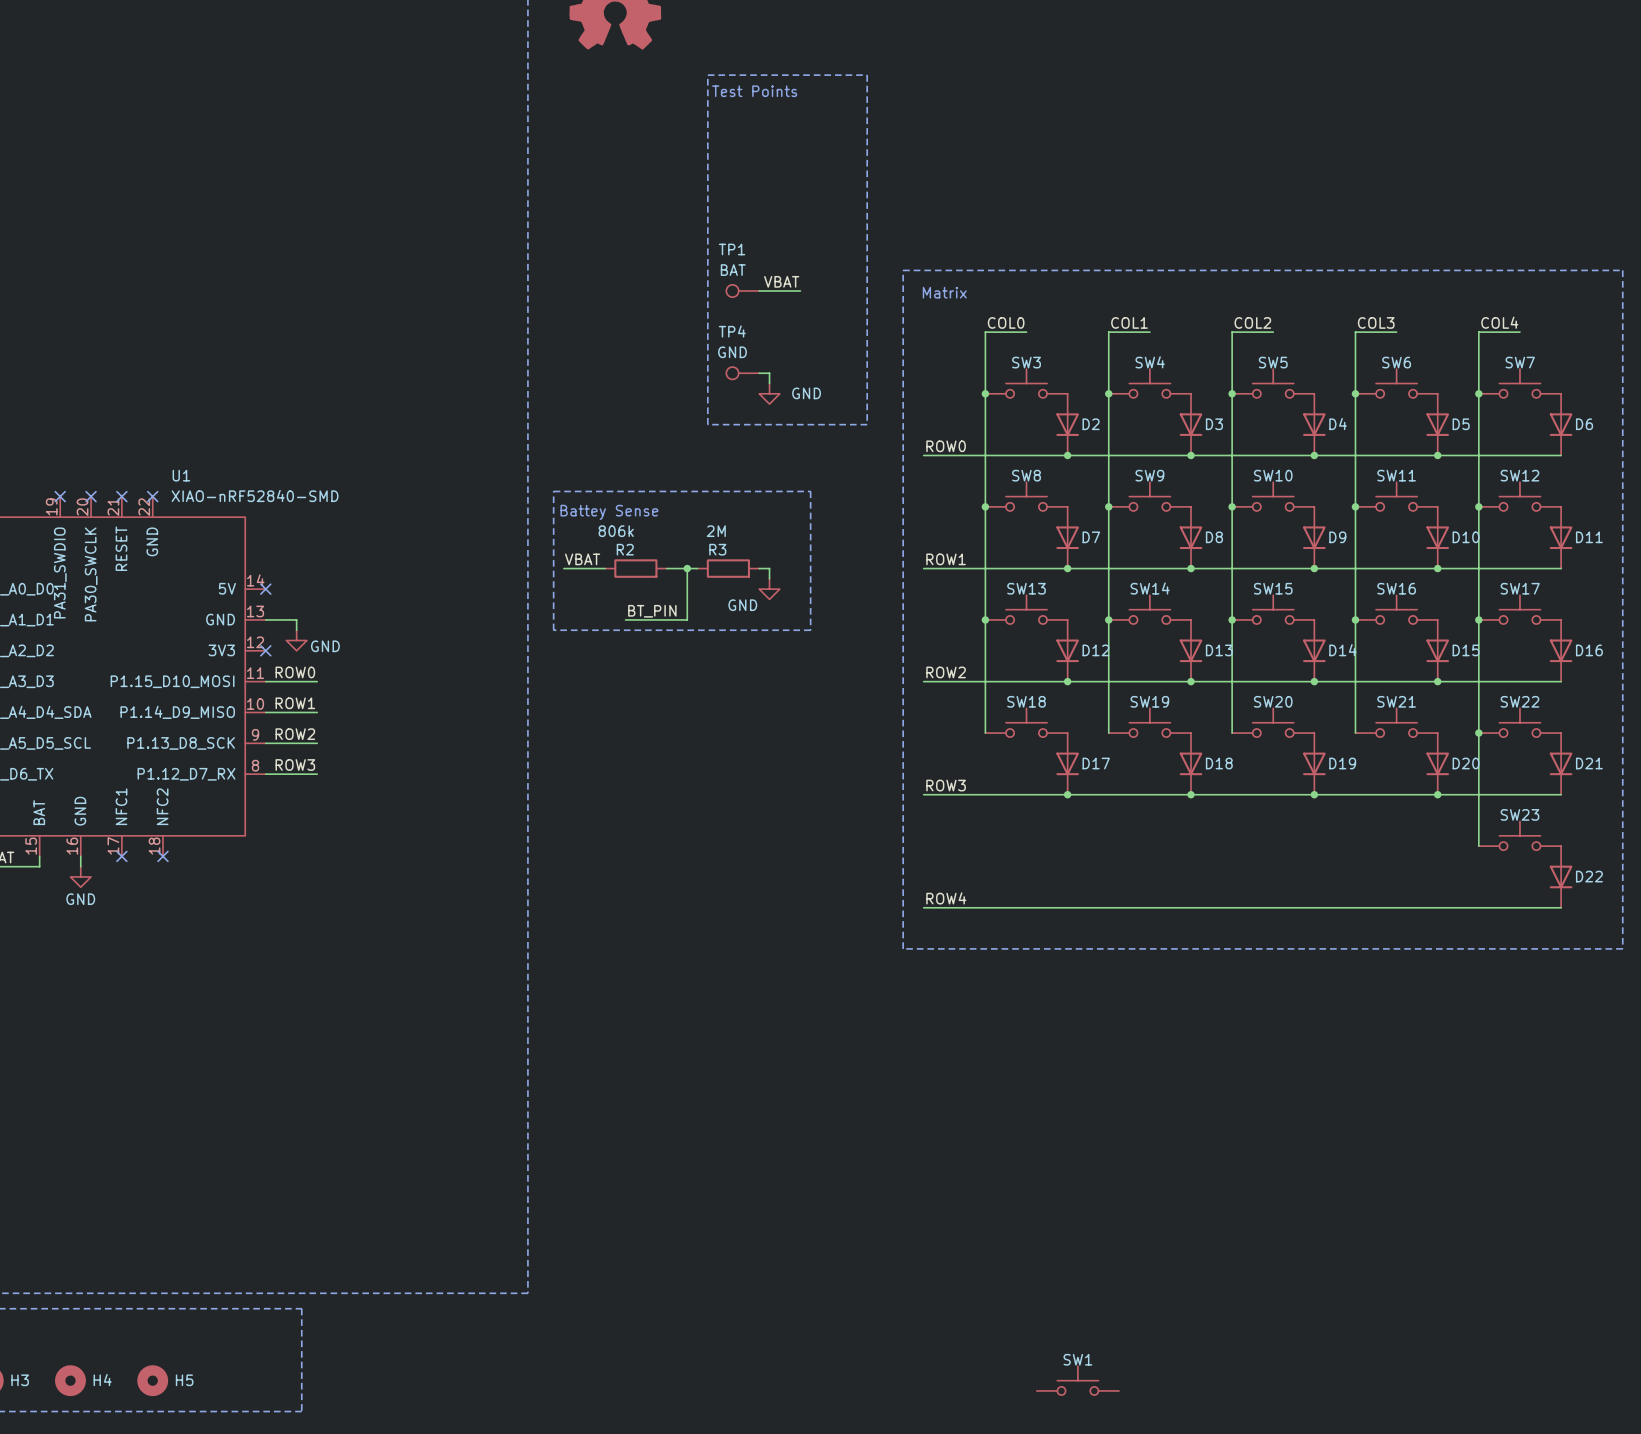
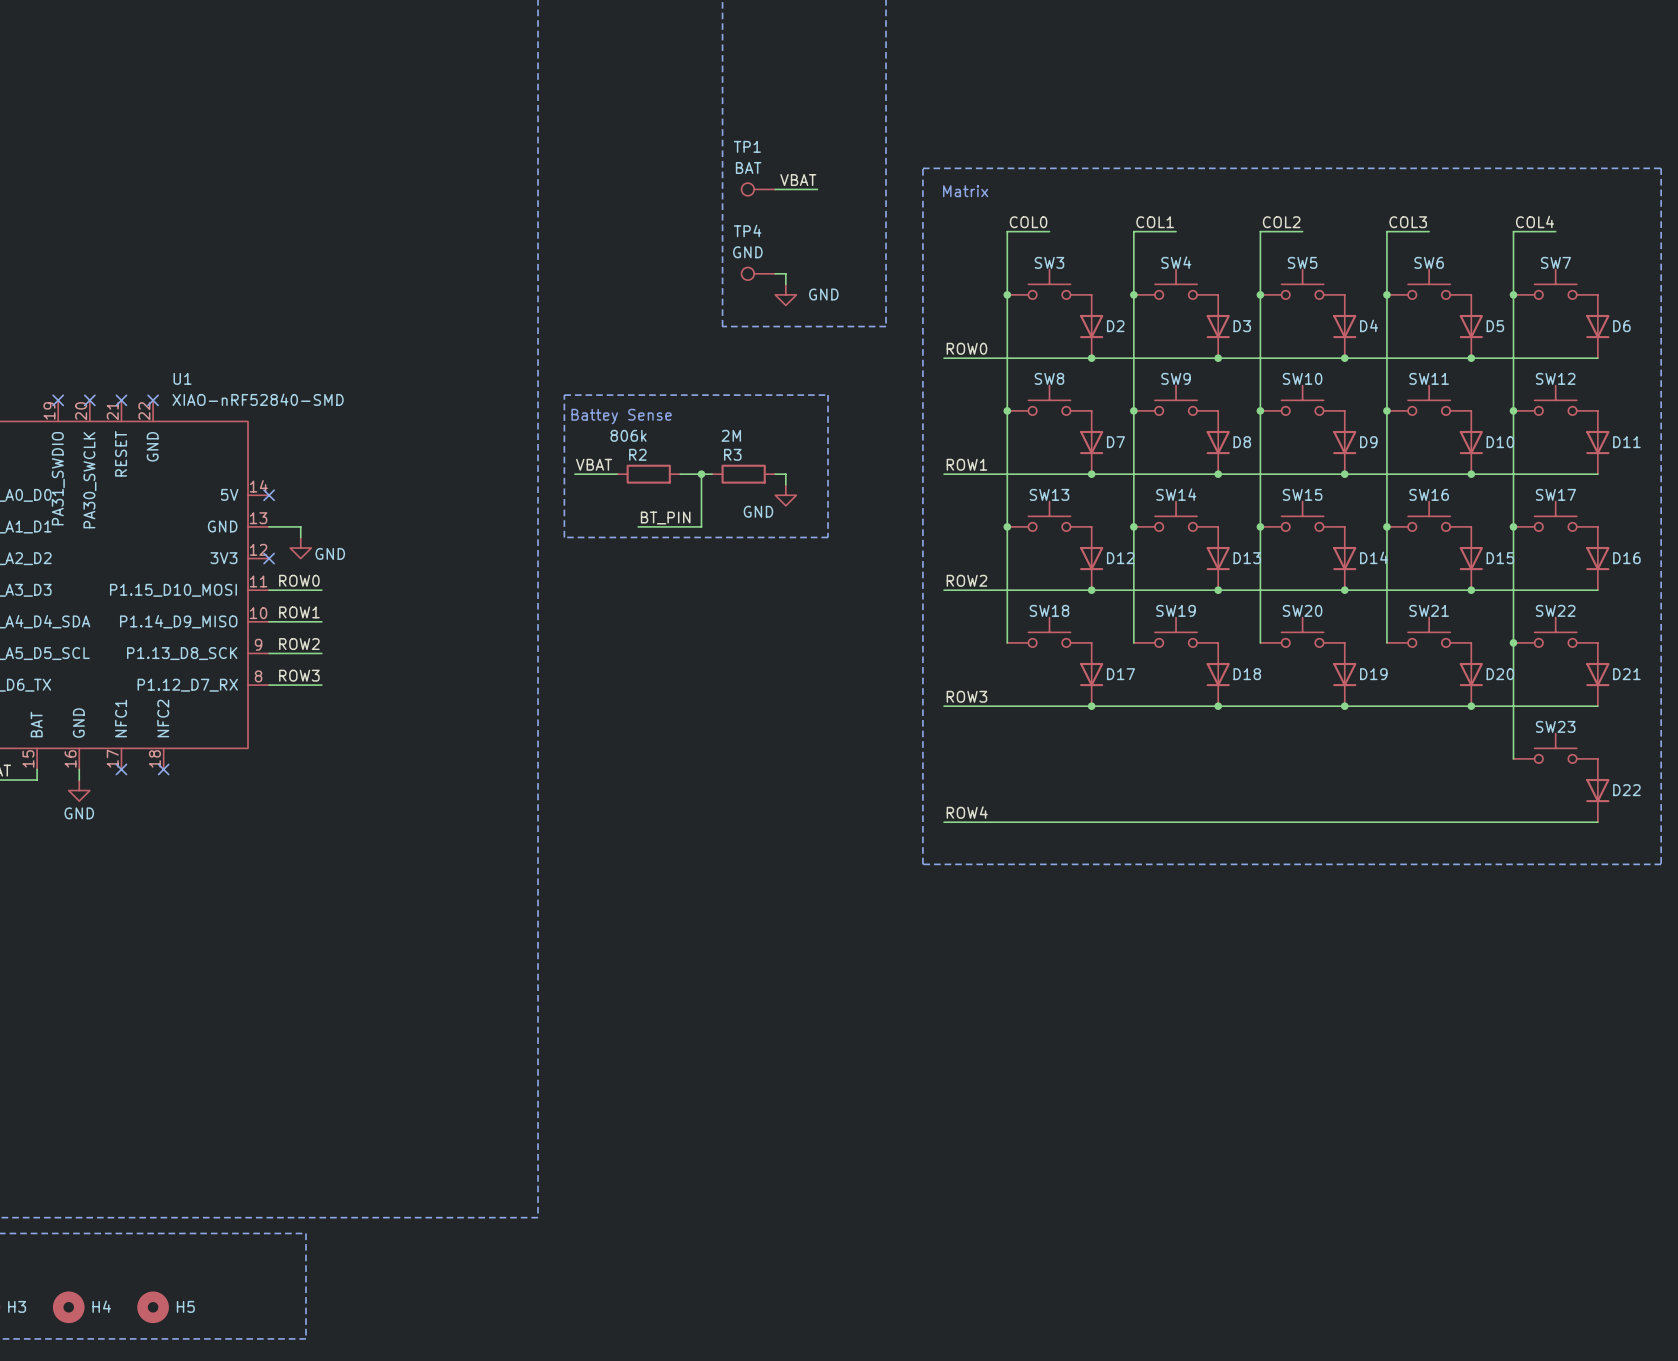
SW1: (1077, 1380) -> none

